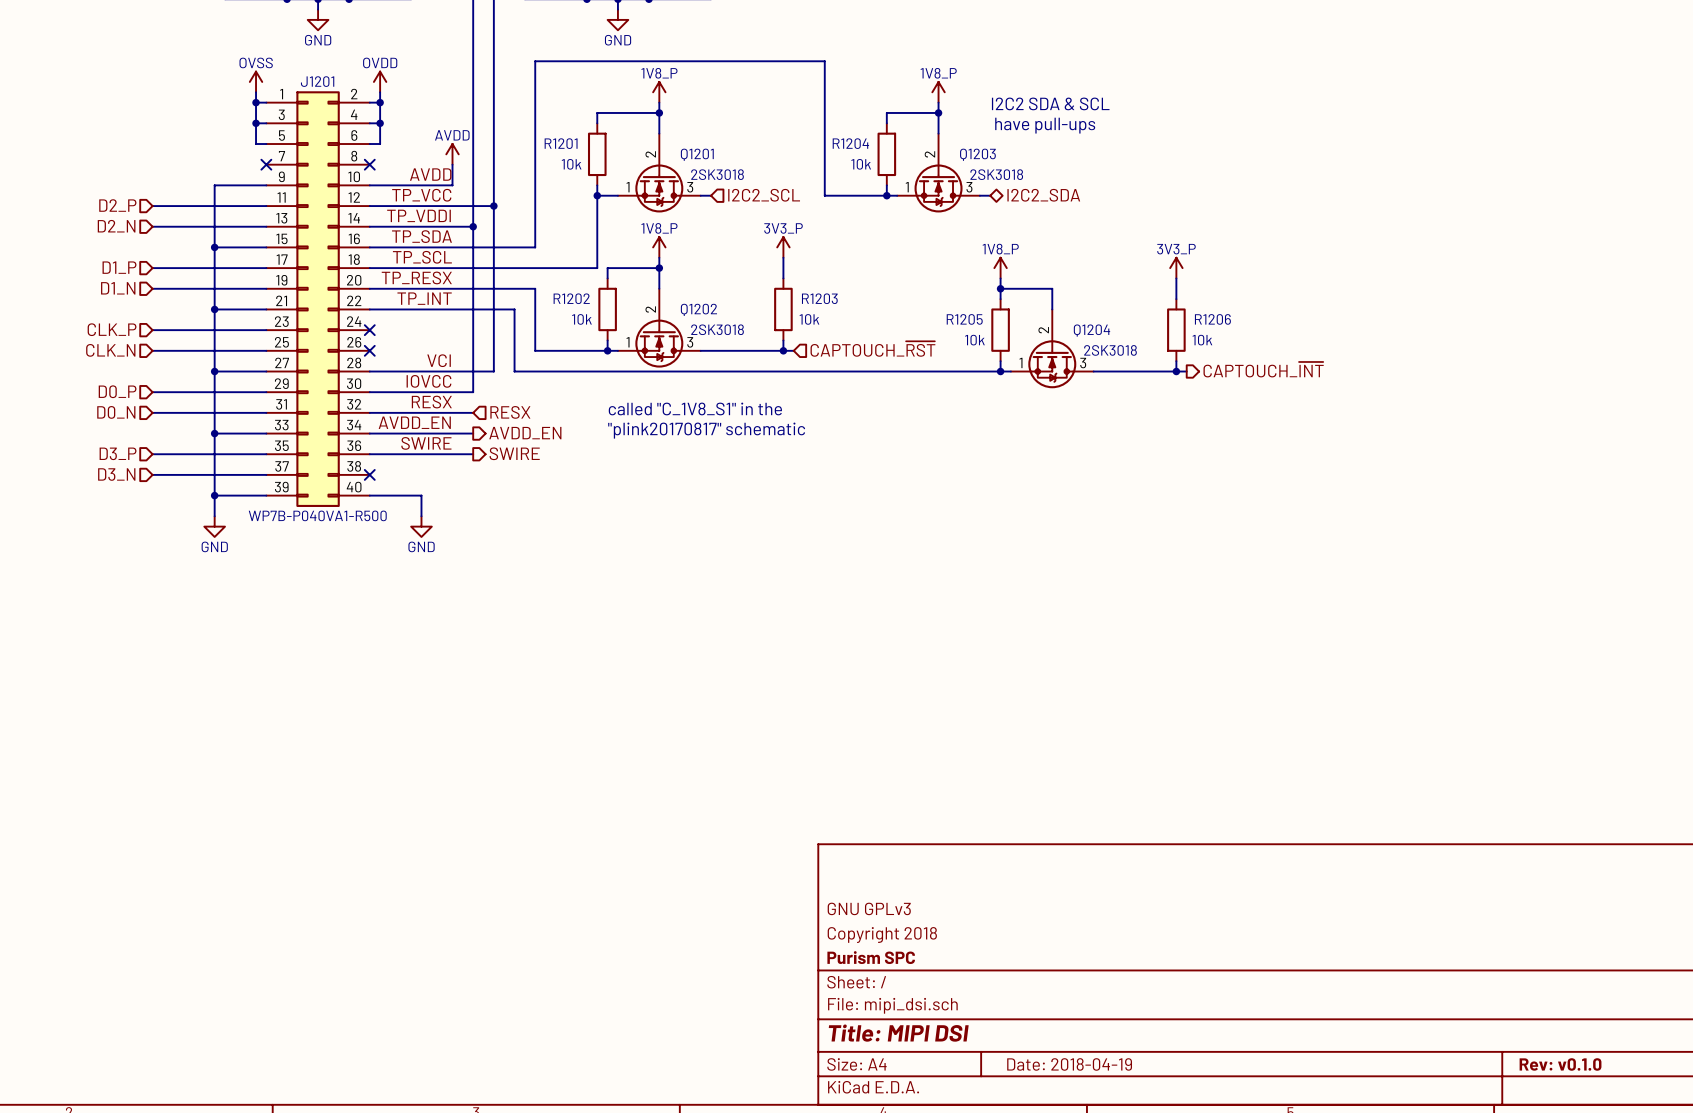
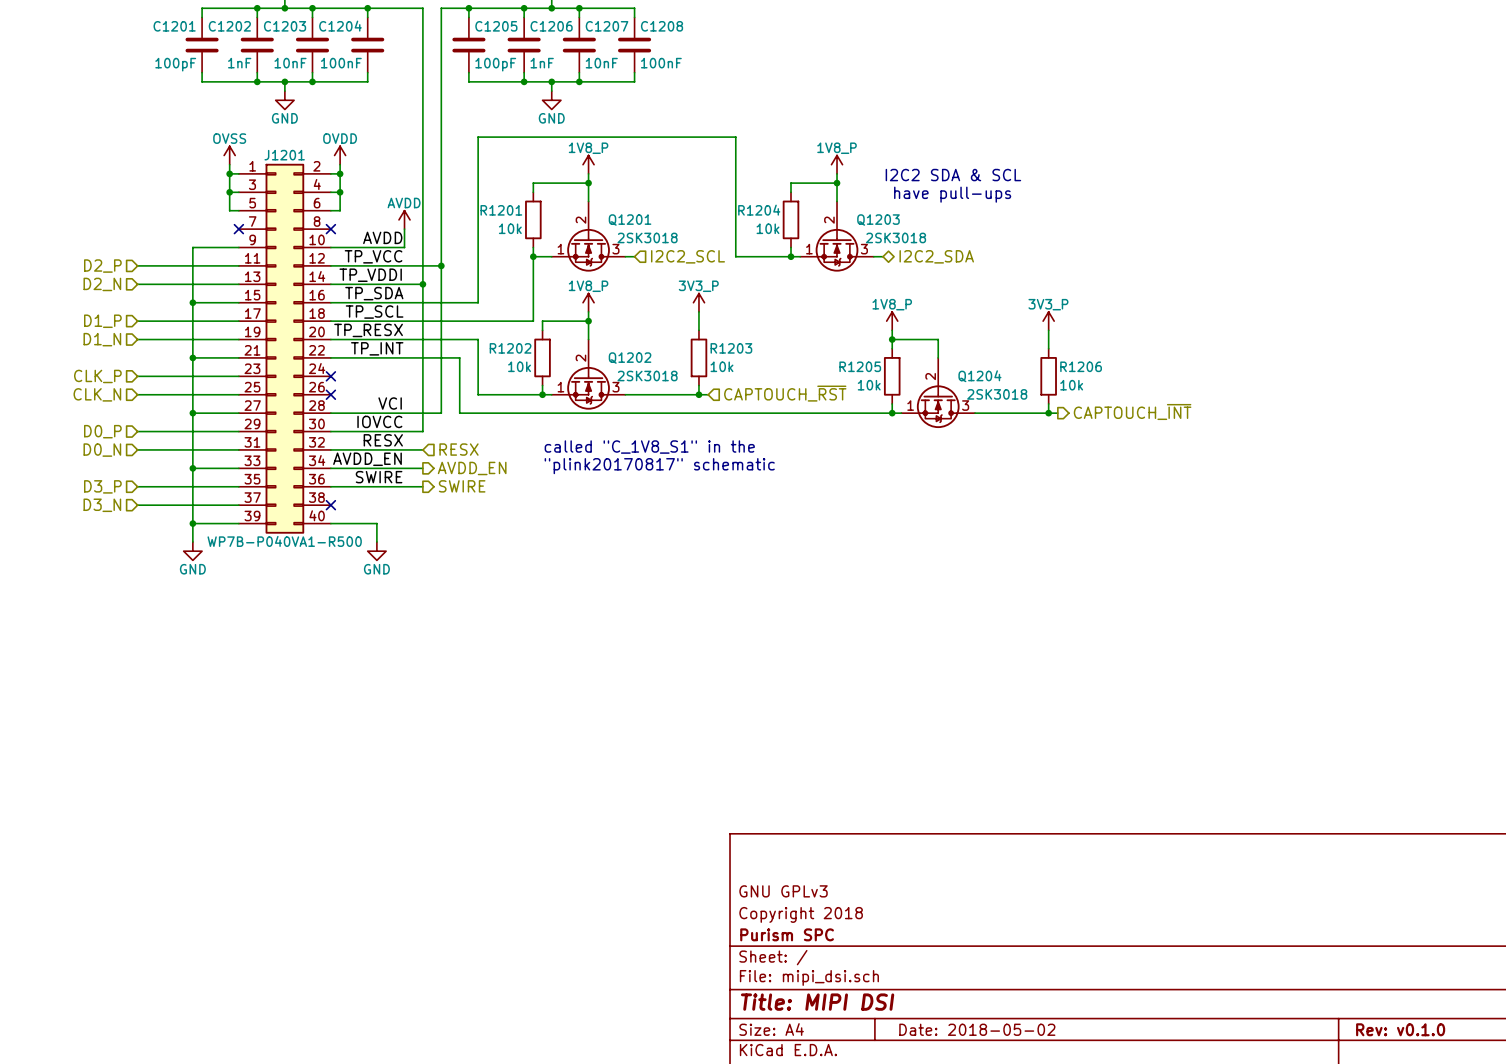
title block: Date: 2018-04-19 (1069, 1064) -> Date: 2018-05-02 (977, 1029)

